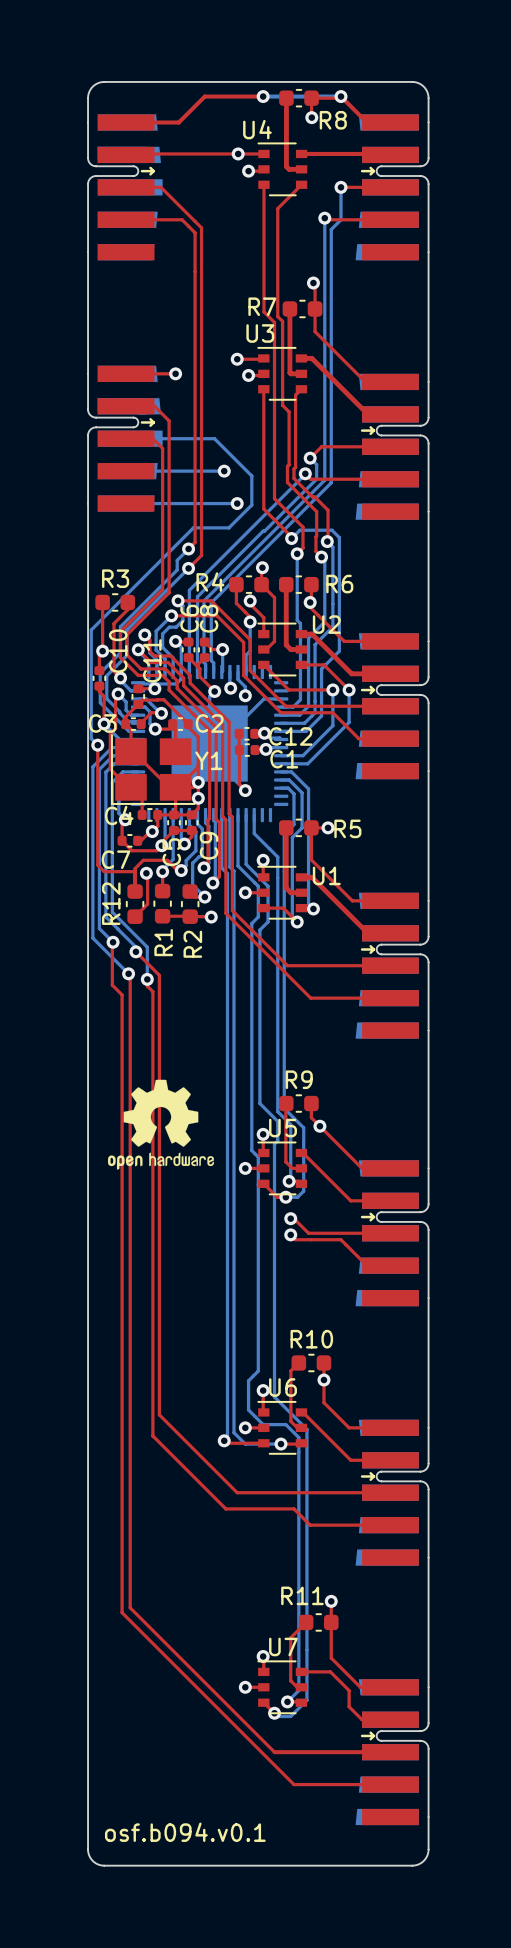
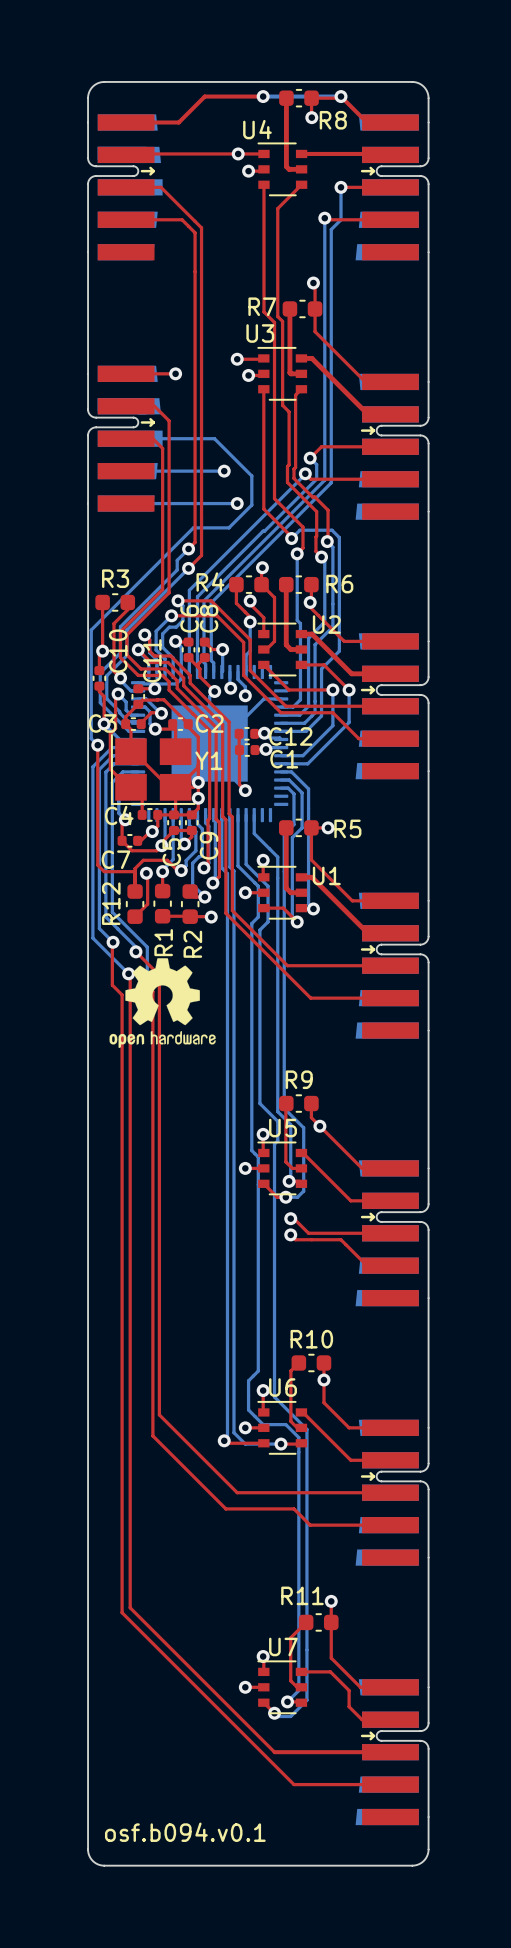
drawing position: (161, 1124) -> (162, 1003)

